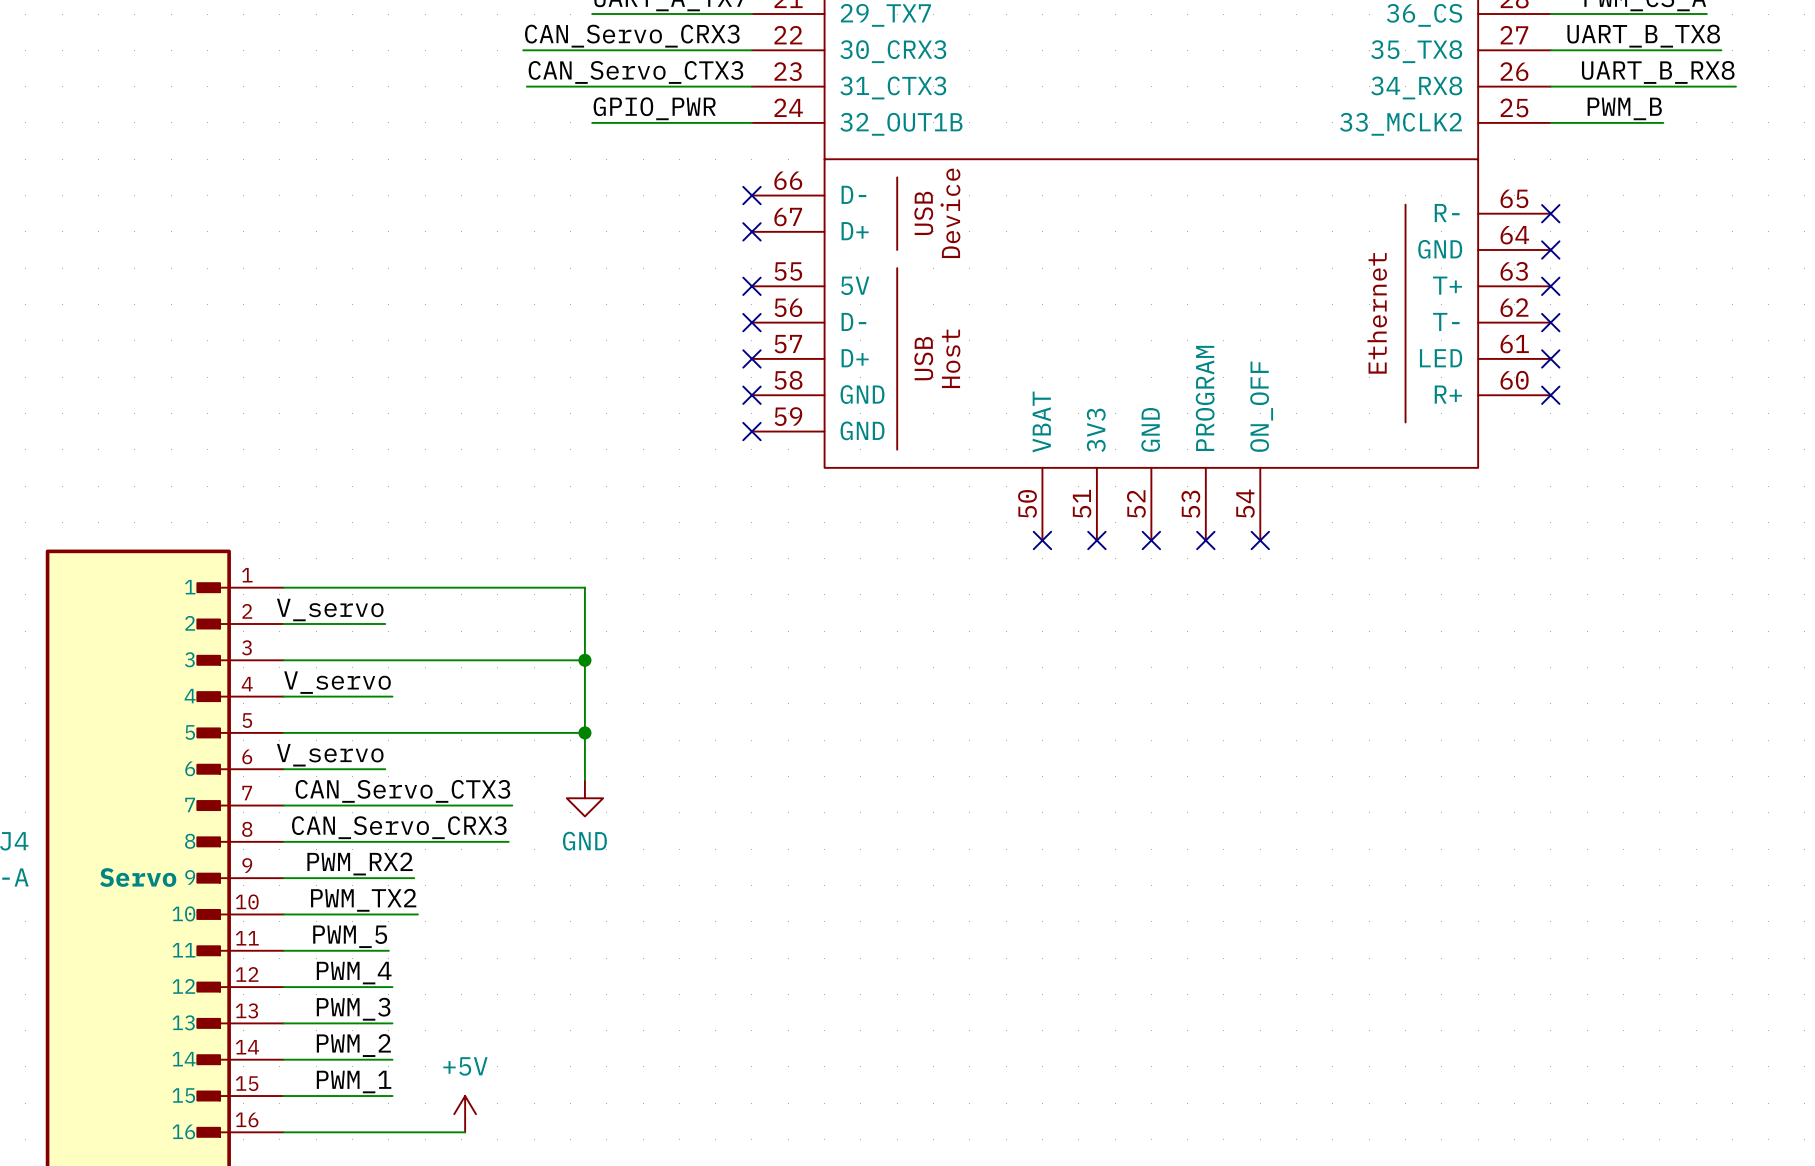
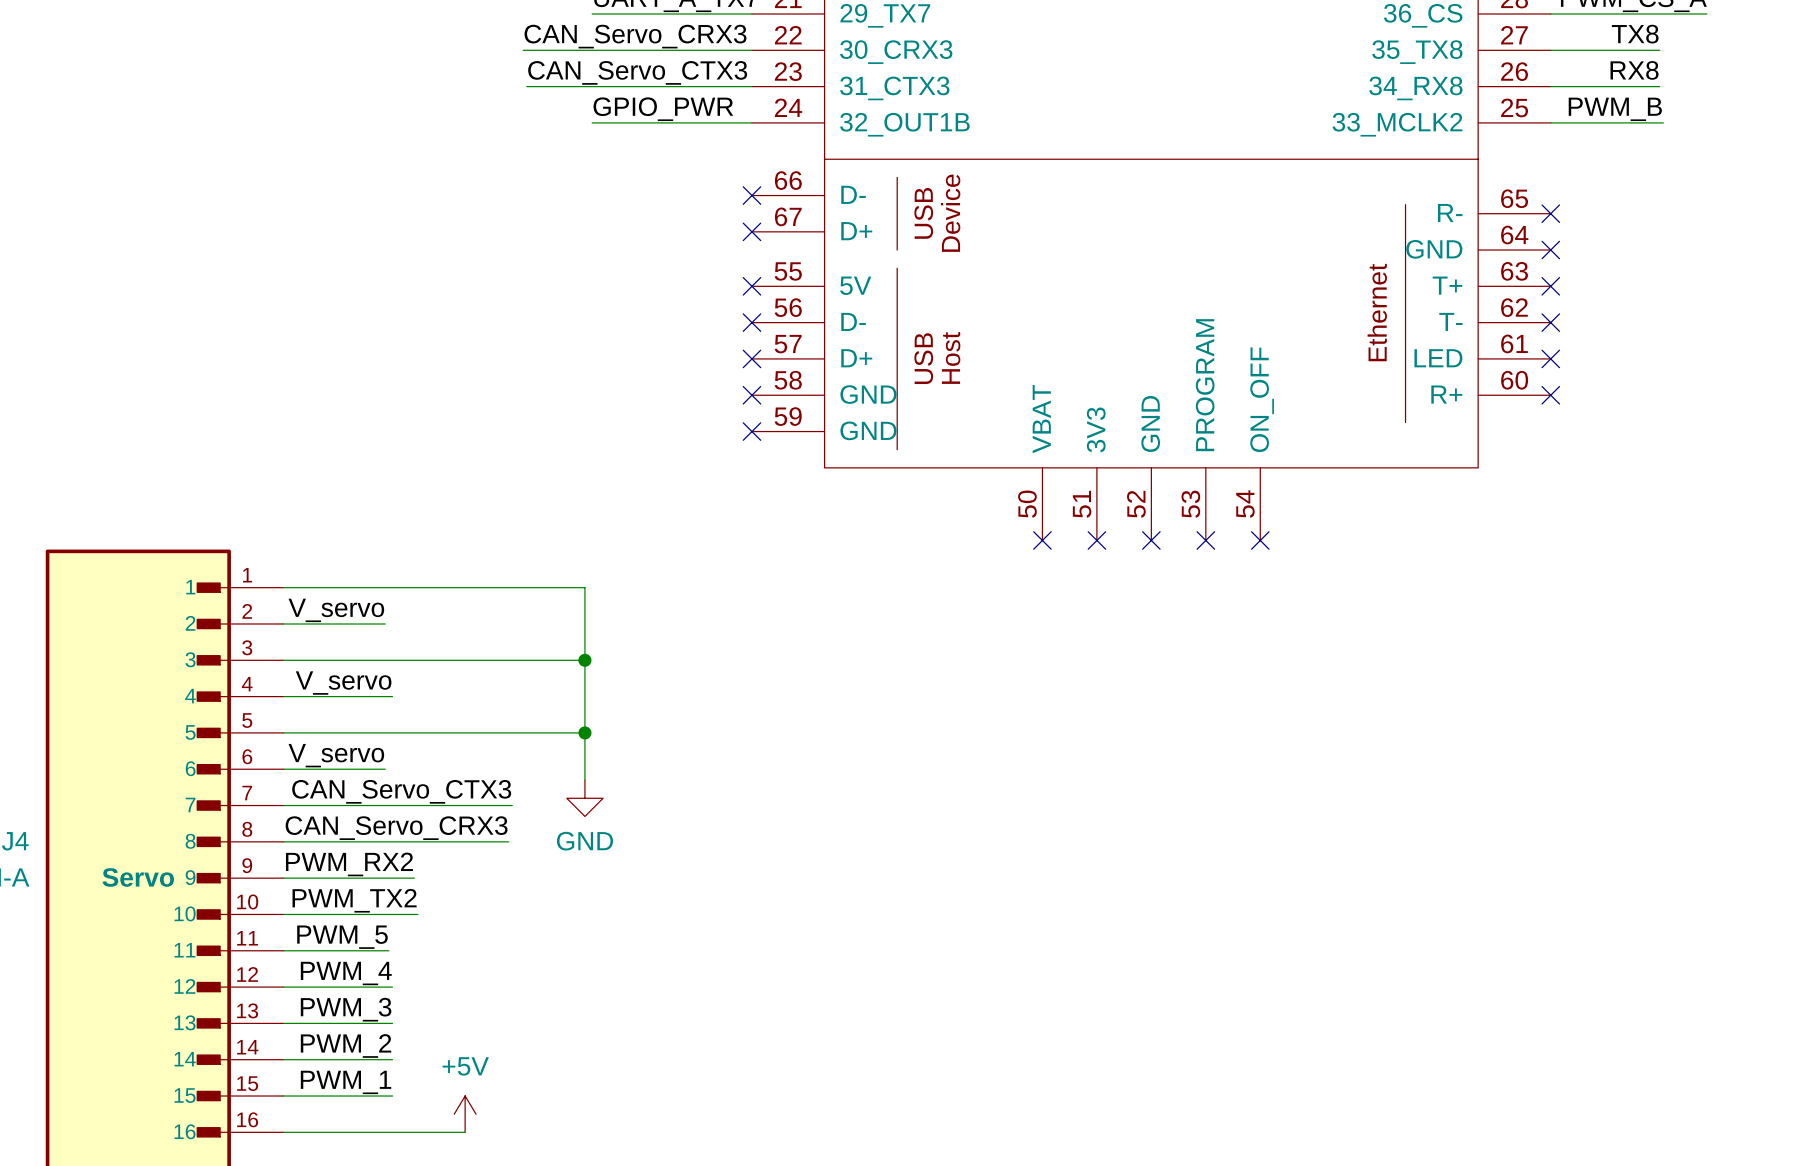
label: none -> TX8 (1635, 34)
label: UART_B_TX8 (1643, 36) -> none
wire: (1659, 50) (1721, 50) -> none
label: none -> RX8 (1634, 70)
label: UART_B_RX8 (1658, 72) -> none
wire: (1659, 86) (1735, 86) -> none

